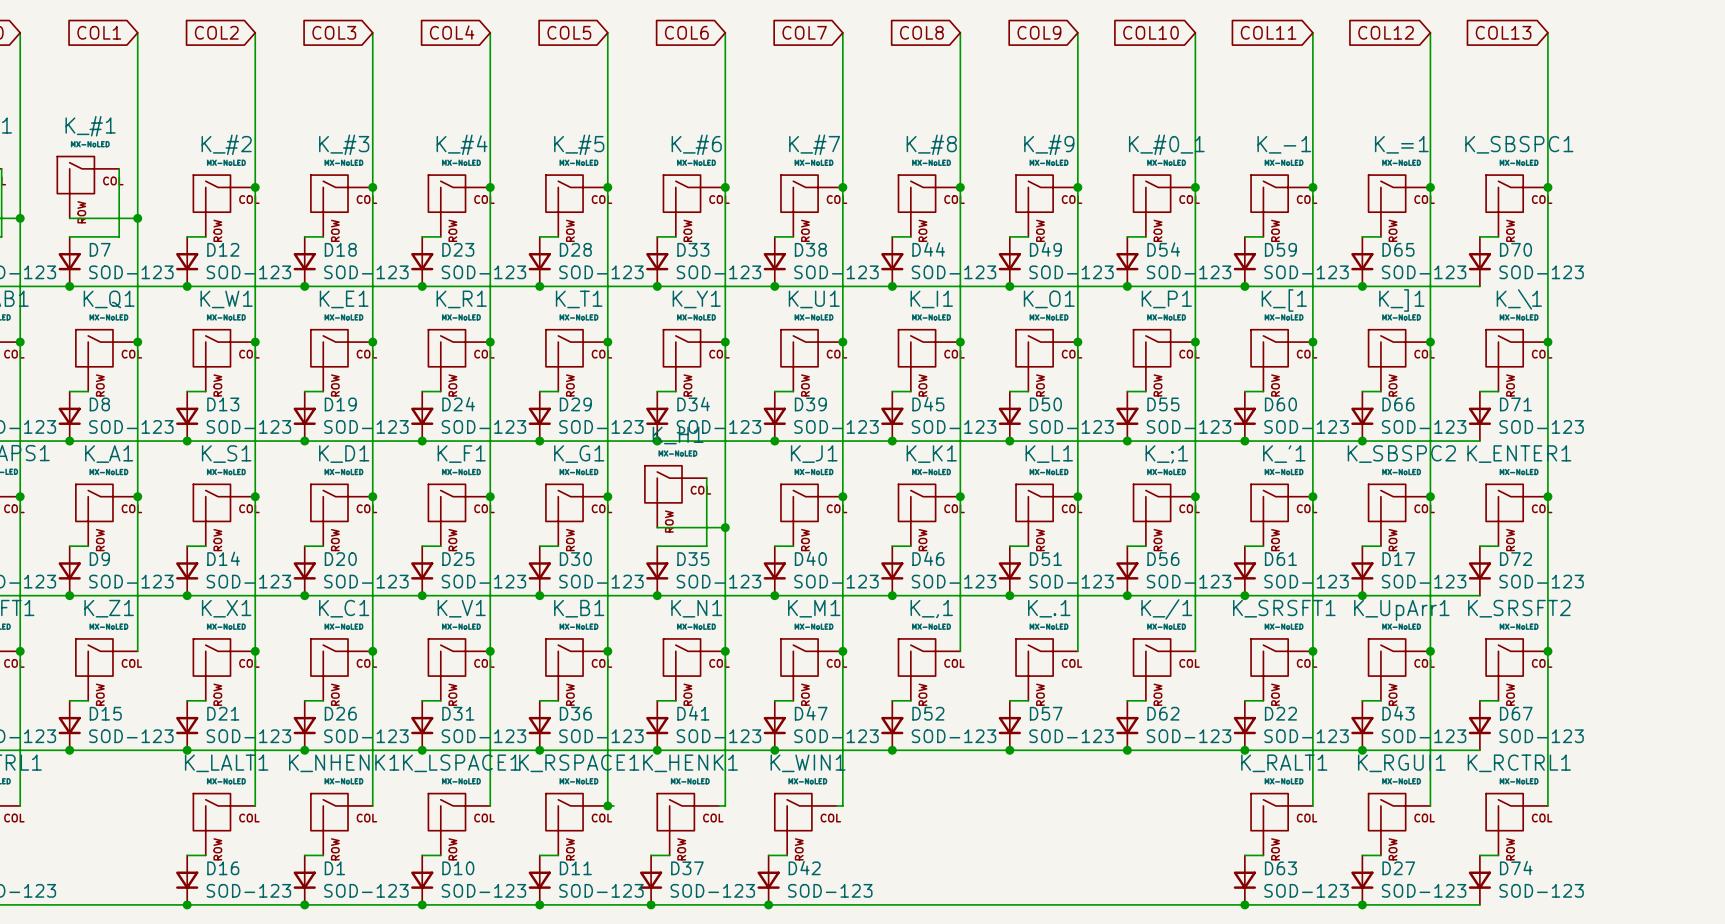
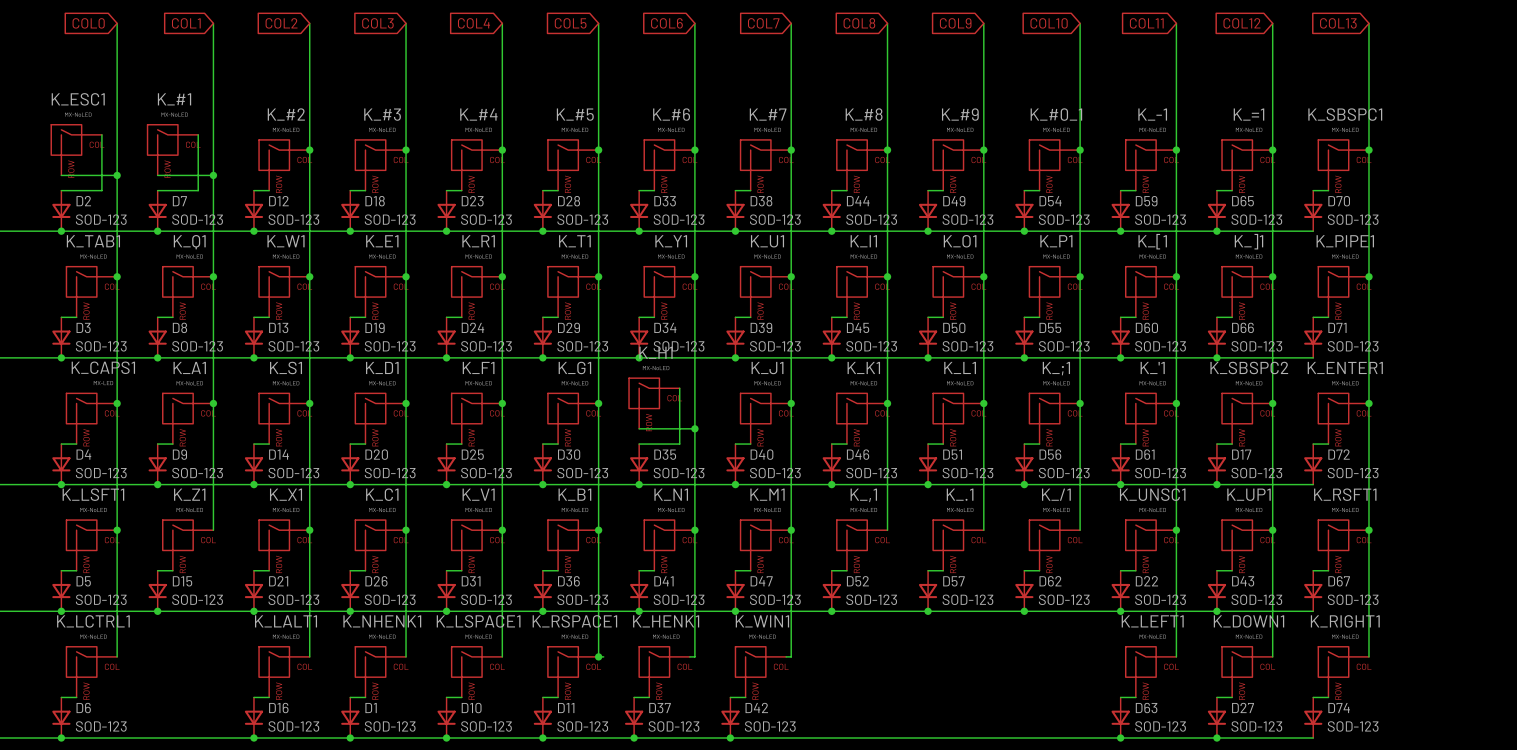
K_\1 name: K_\1 (1519, 299) -> K_PIPE1 (1345, 241)
K_SRSFT1 name: K_SRSFT1 (1284, 608) -> K_UNSC1 (1152, 494)
K_SRSFT2 name: K_SRSFT2 (1519, 608) -> K_RSFT1 (1345, 494)
K_UpArr1 name: K_UpArr1 (1401, 610) -> K_UP1 (1248, 494)
K_RALT1 name: K_RALT1 (1284, 763) -> K_LEFT1 (1152, 621)
K_RGUI1 name: K_RGUI1 (1401, 763) -> K_DOWN1 (1248, 621)
K_RCTRL1 name: K_RCTRL1 (1519, 763) -> K_RIGHT1 (1345, 621)

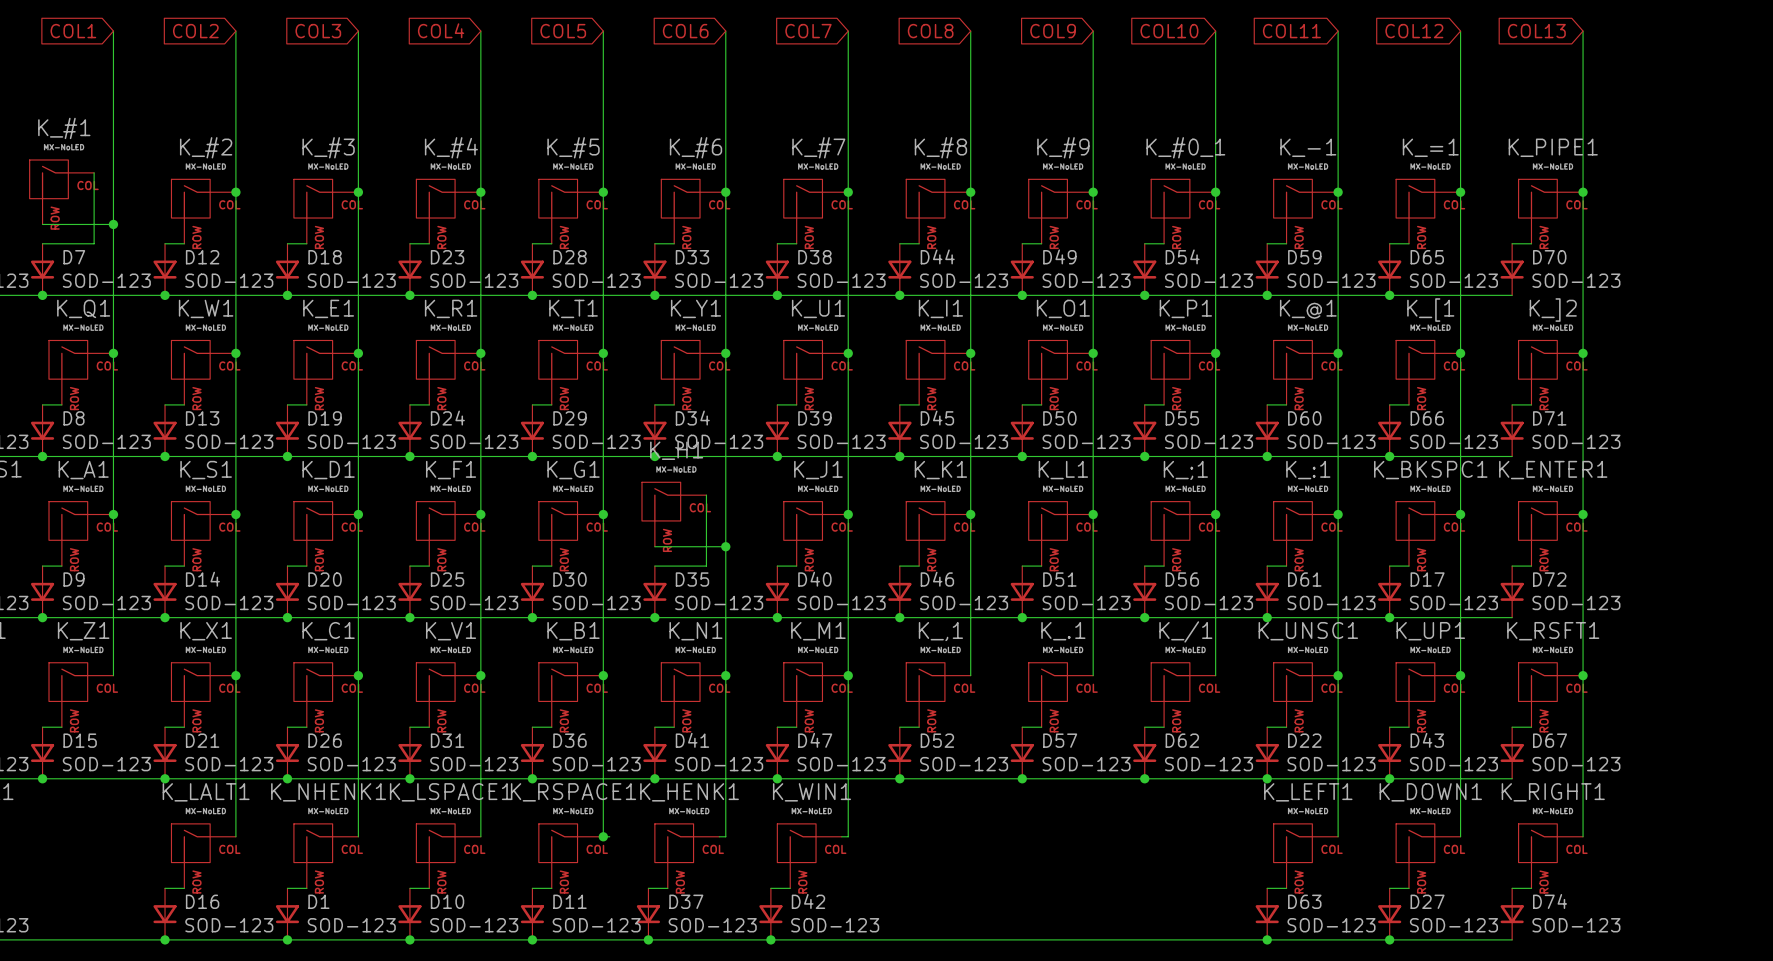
K_SBSPC1 name: K_SBSPC1 (1345, 114) -> K_PIPE1 (1553, 147)
K_[1 name: K_[1 (1152, 241) -> K_@1 (1308, 309)
K_]1 name: K_]1 (1248, 241) -> K_[1 (1430, 310)
K_PIPE1 name: K_PIPE1 (1345, 241) -> K_]2 (1553, 310)
K_'1 name: K_'1 (1152, 367) -> K_:1 (1308, 470)
K_SBSPC2 name: K_SBSPC2 (1249, 367) -> K_BKSPC1 (1430, 470)

